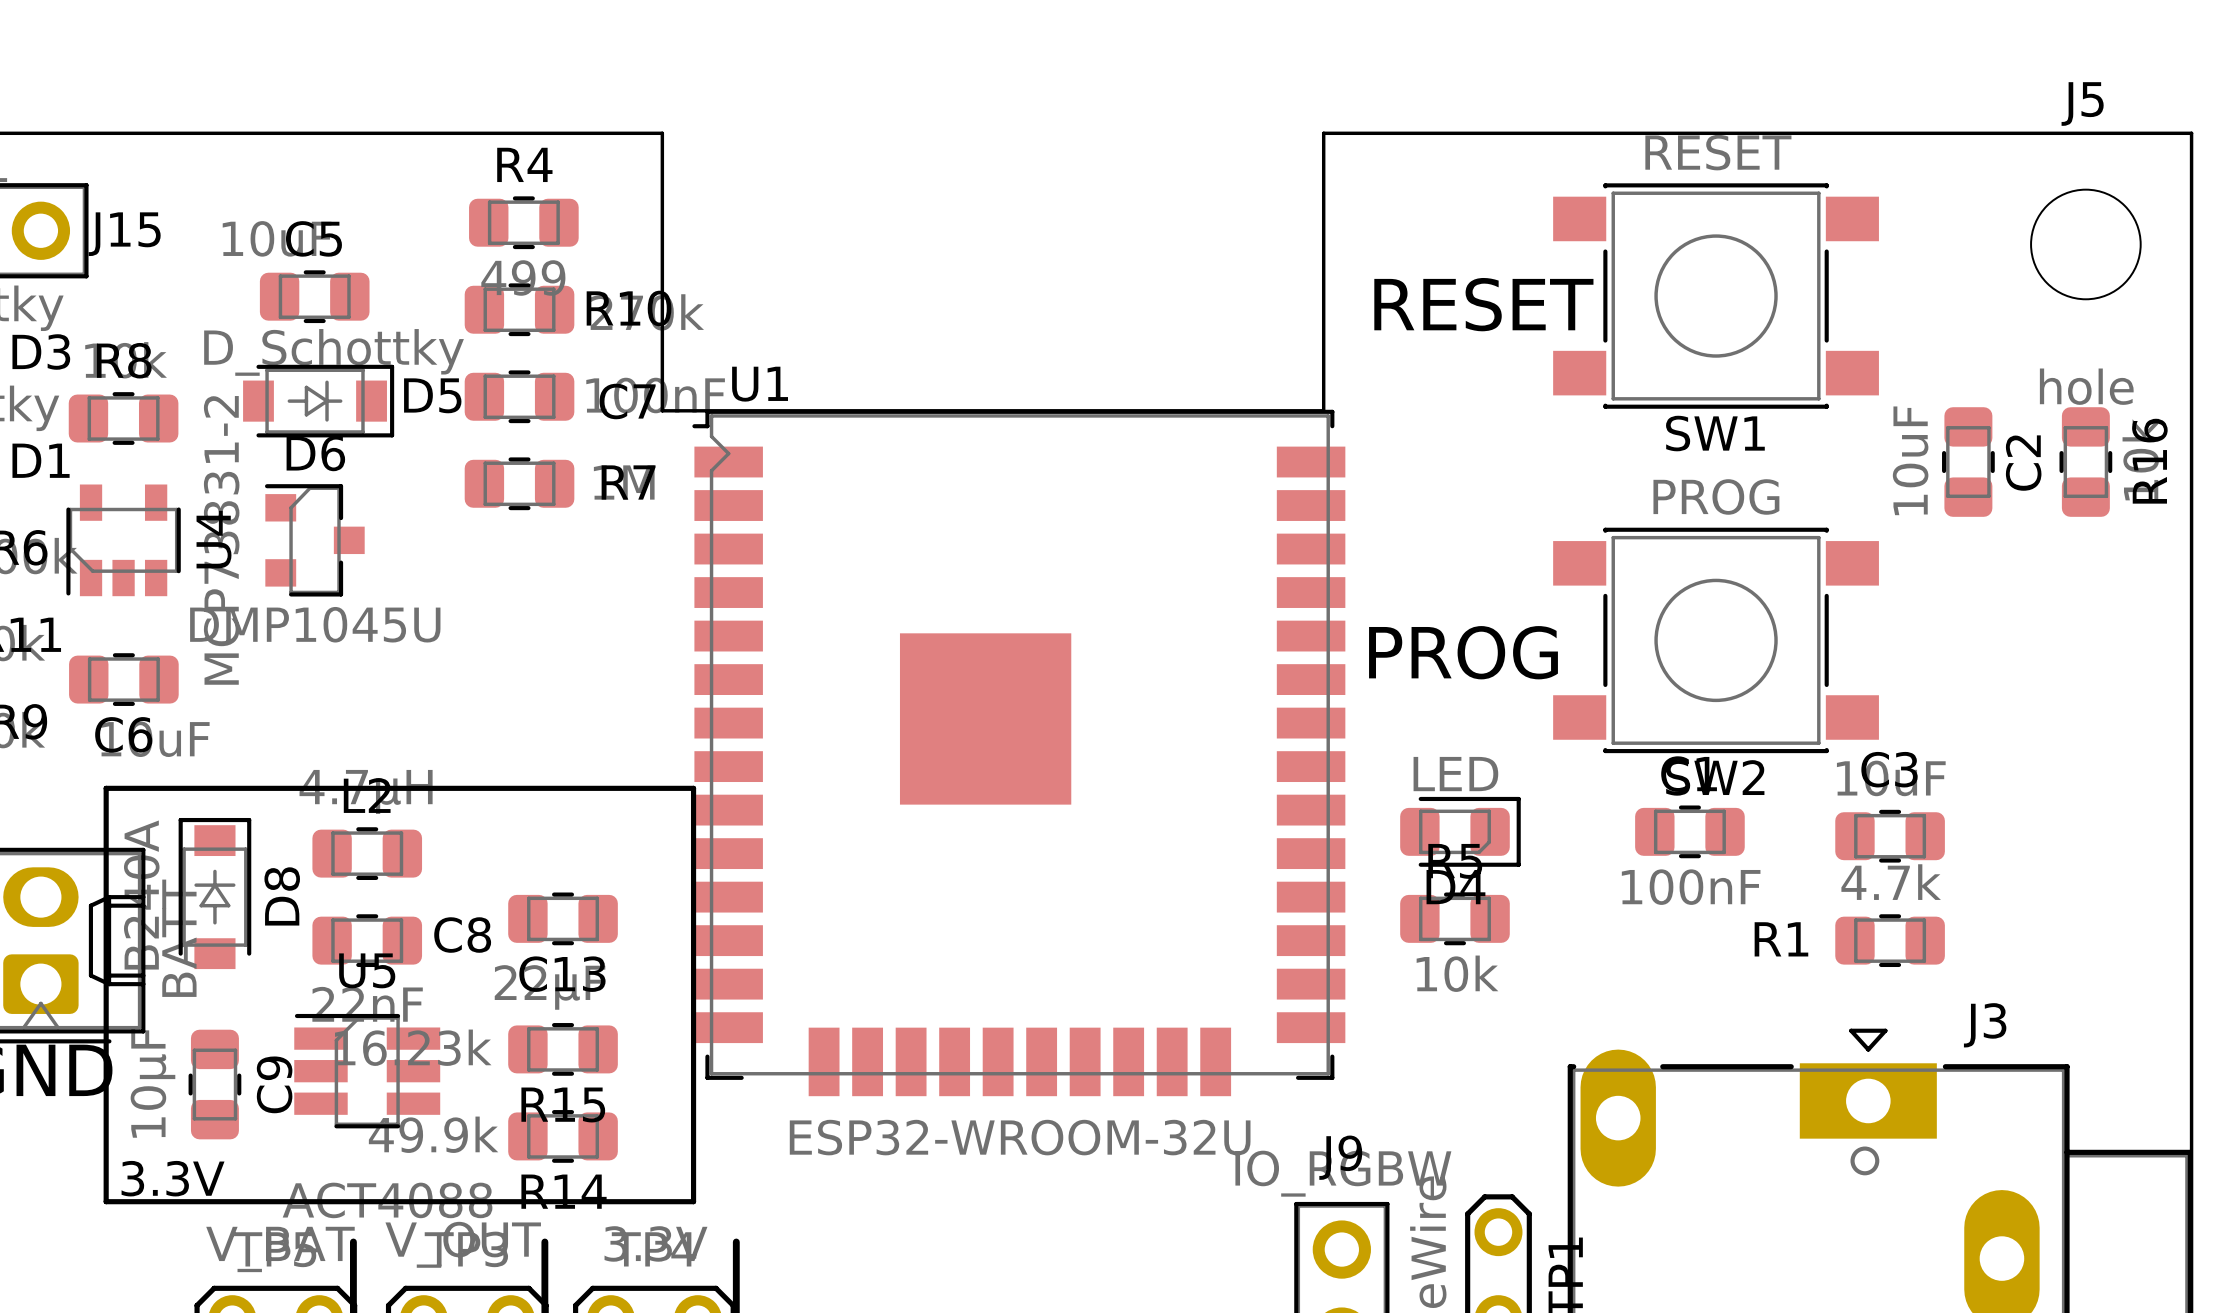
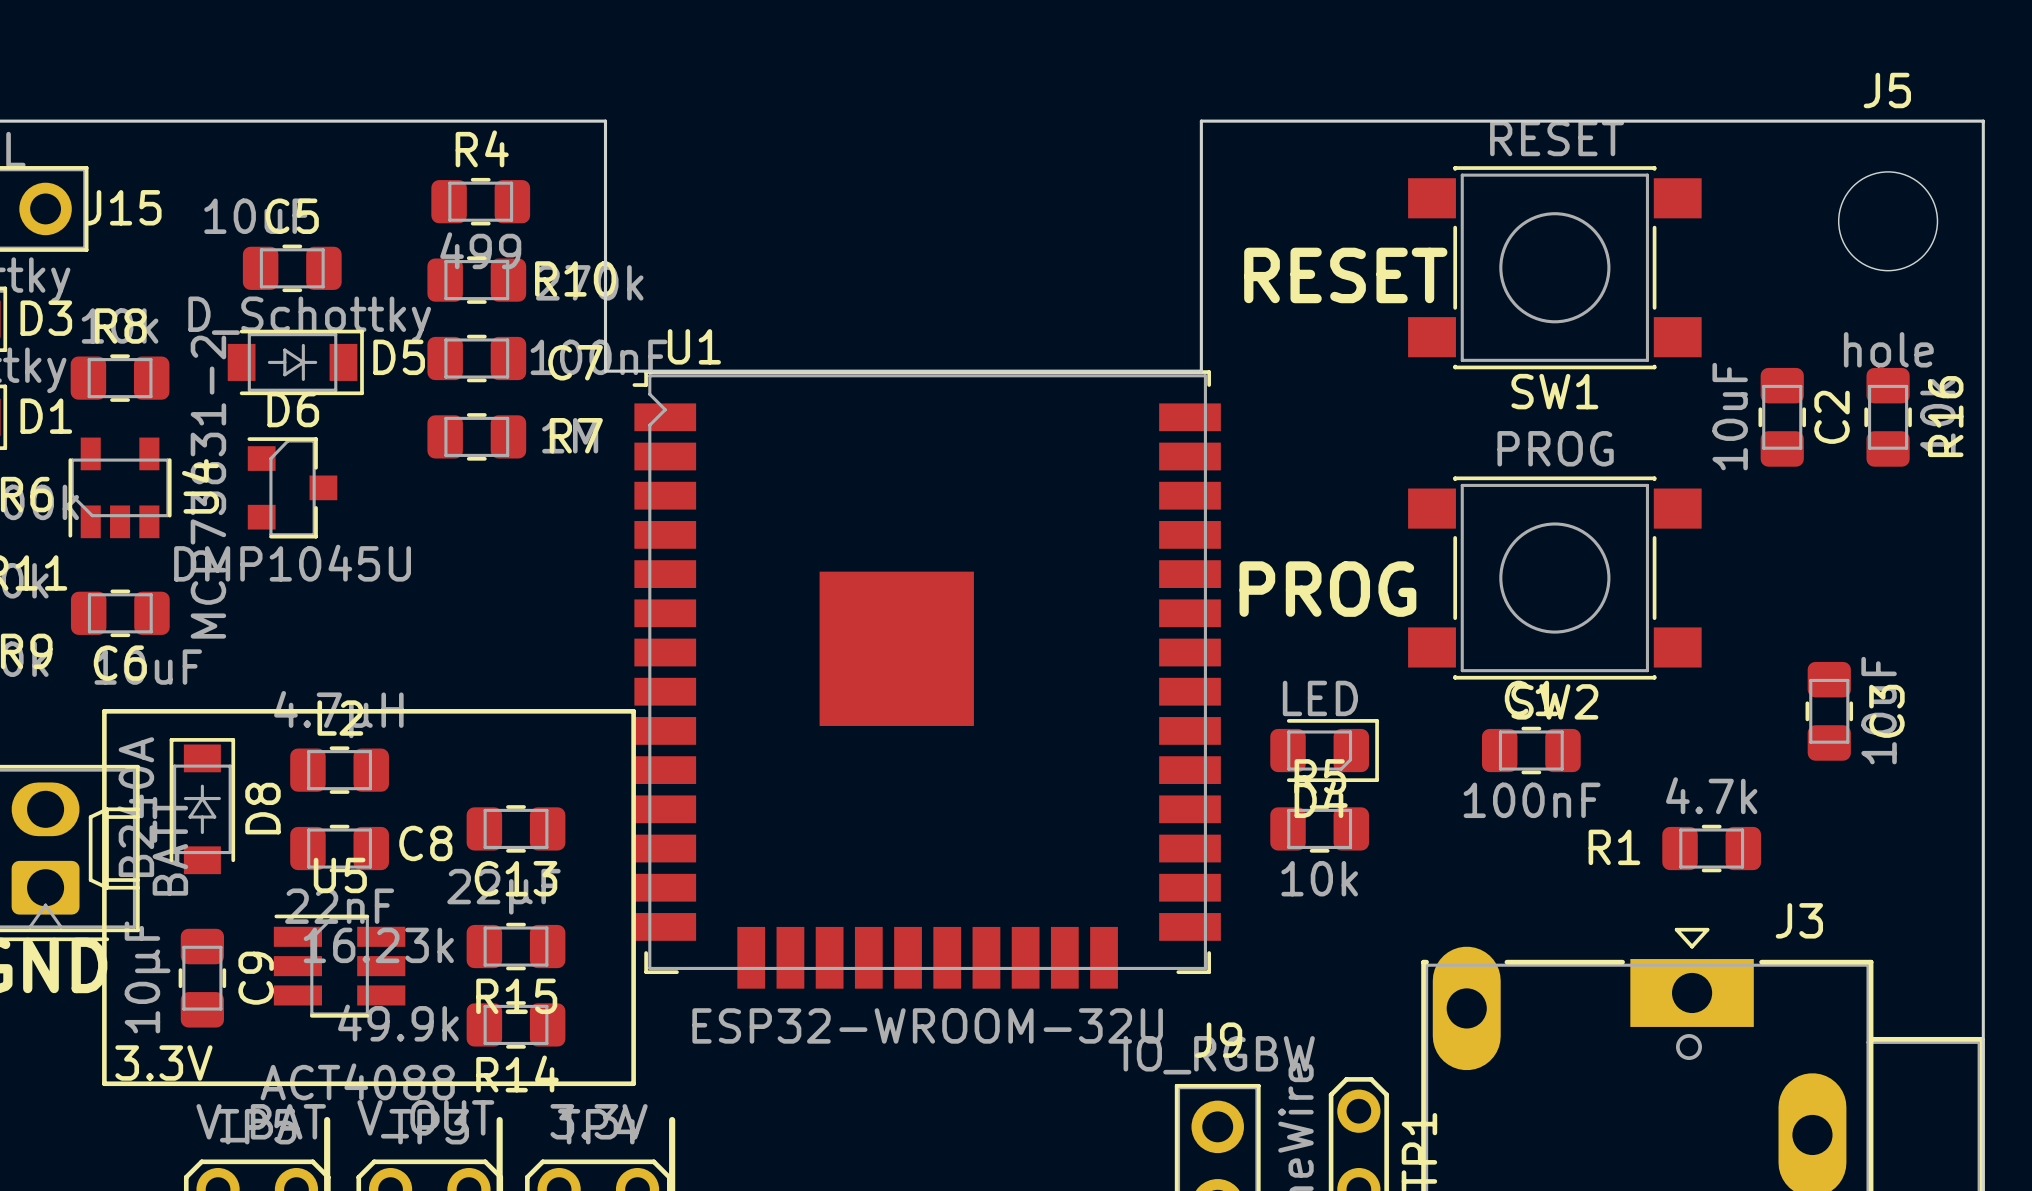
C3 rotation: 0° (1890, 836) -> 90° clockwise (1829, 711)
C3 position: (1890, 836) -> (1829, 711)

